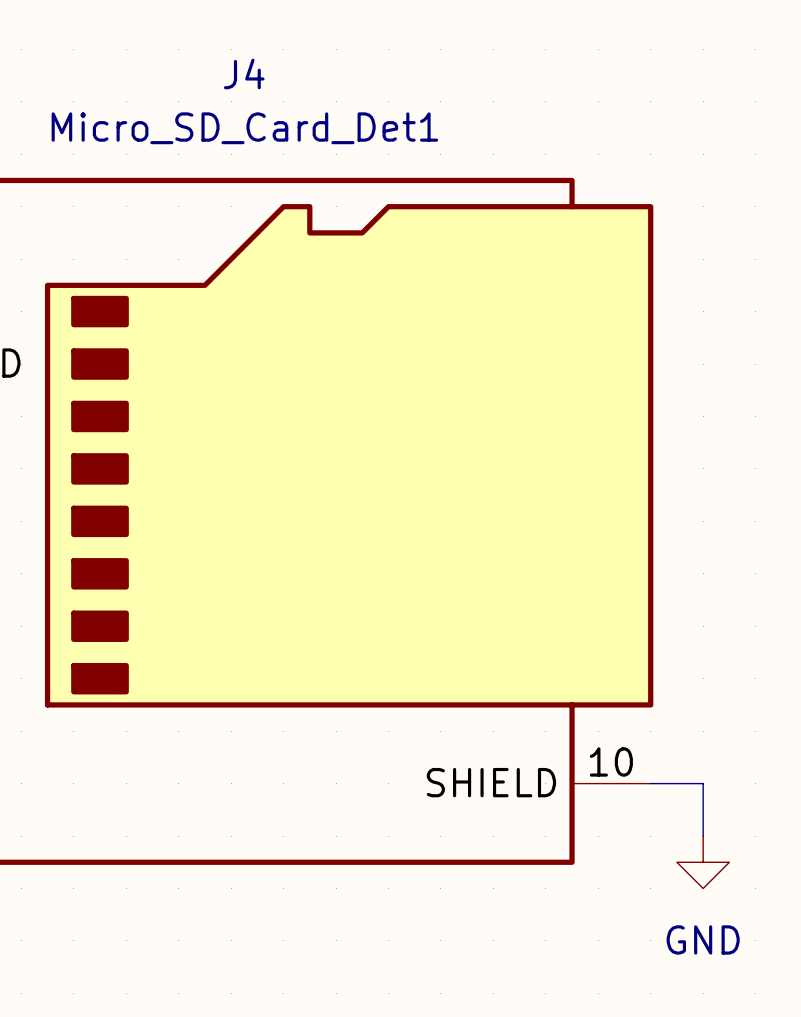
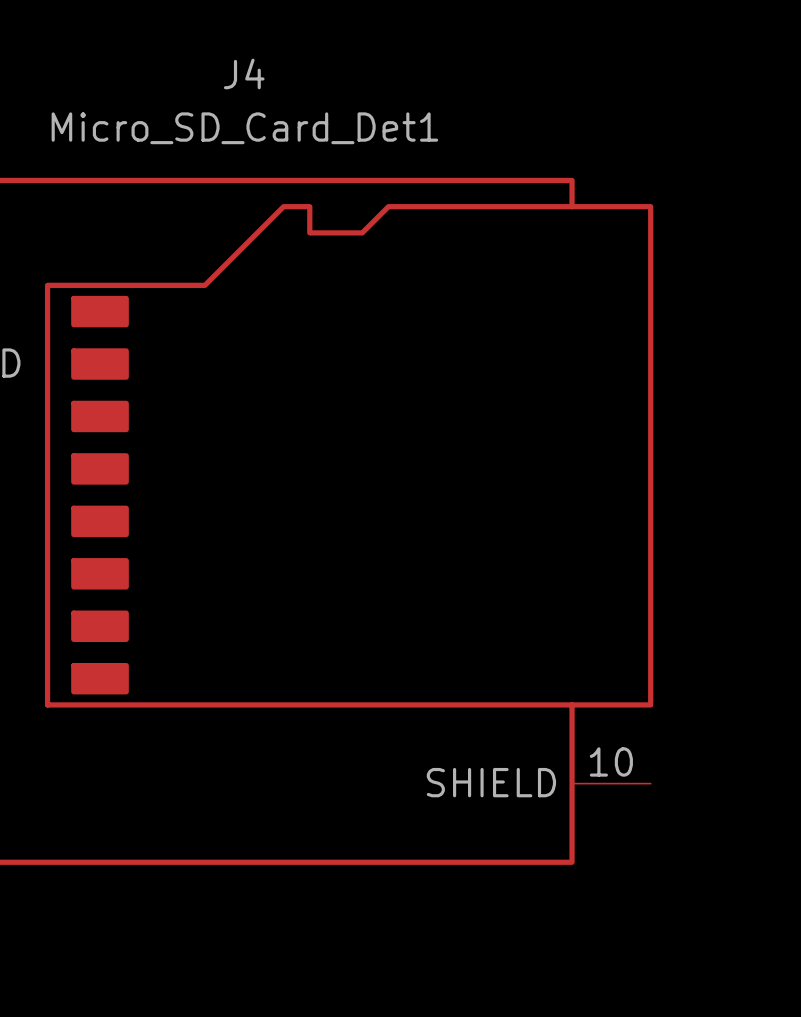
wire: (650, 783) (703, 783) (703, 836) -> none
power symbol: GND (703, 862) -> none

